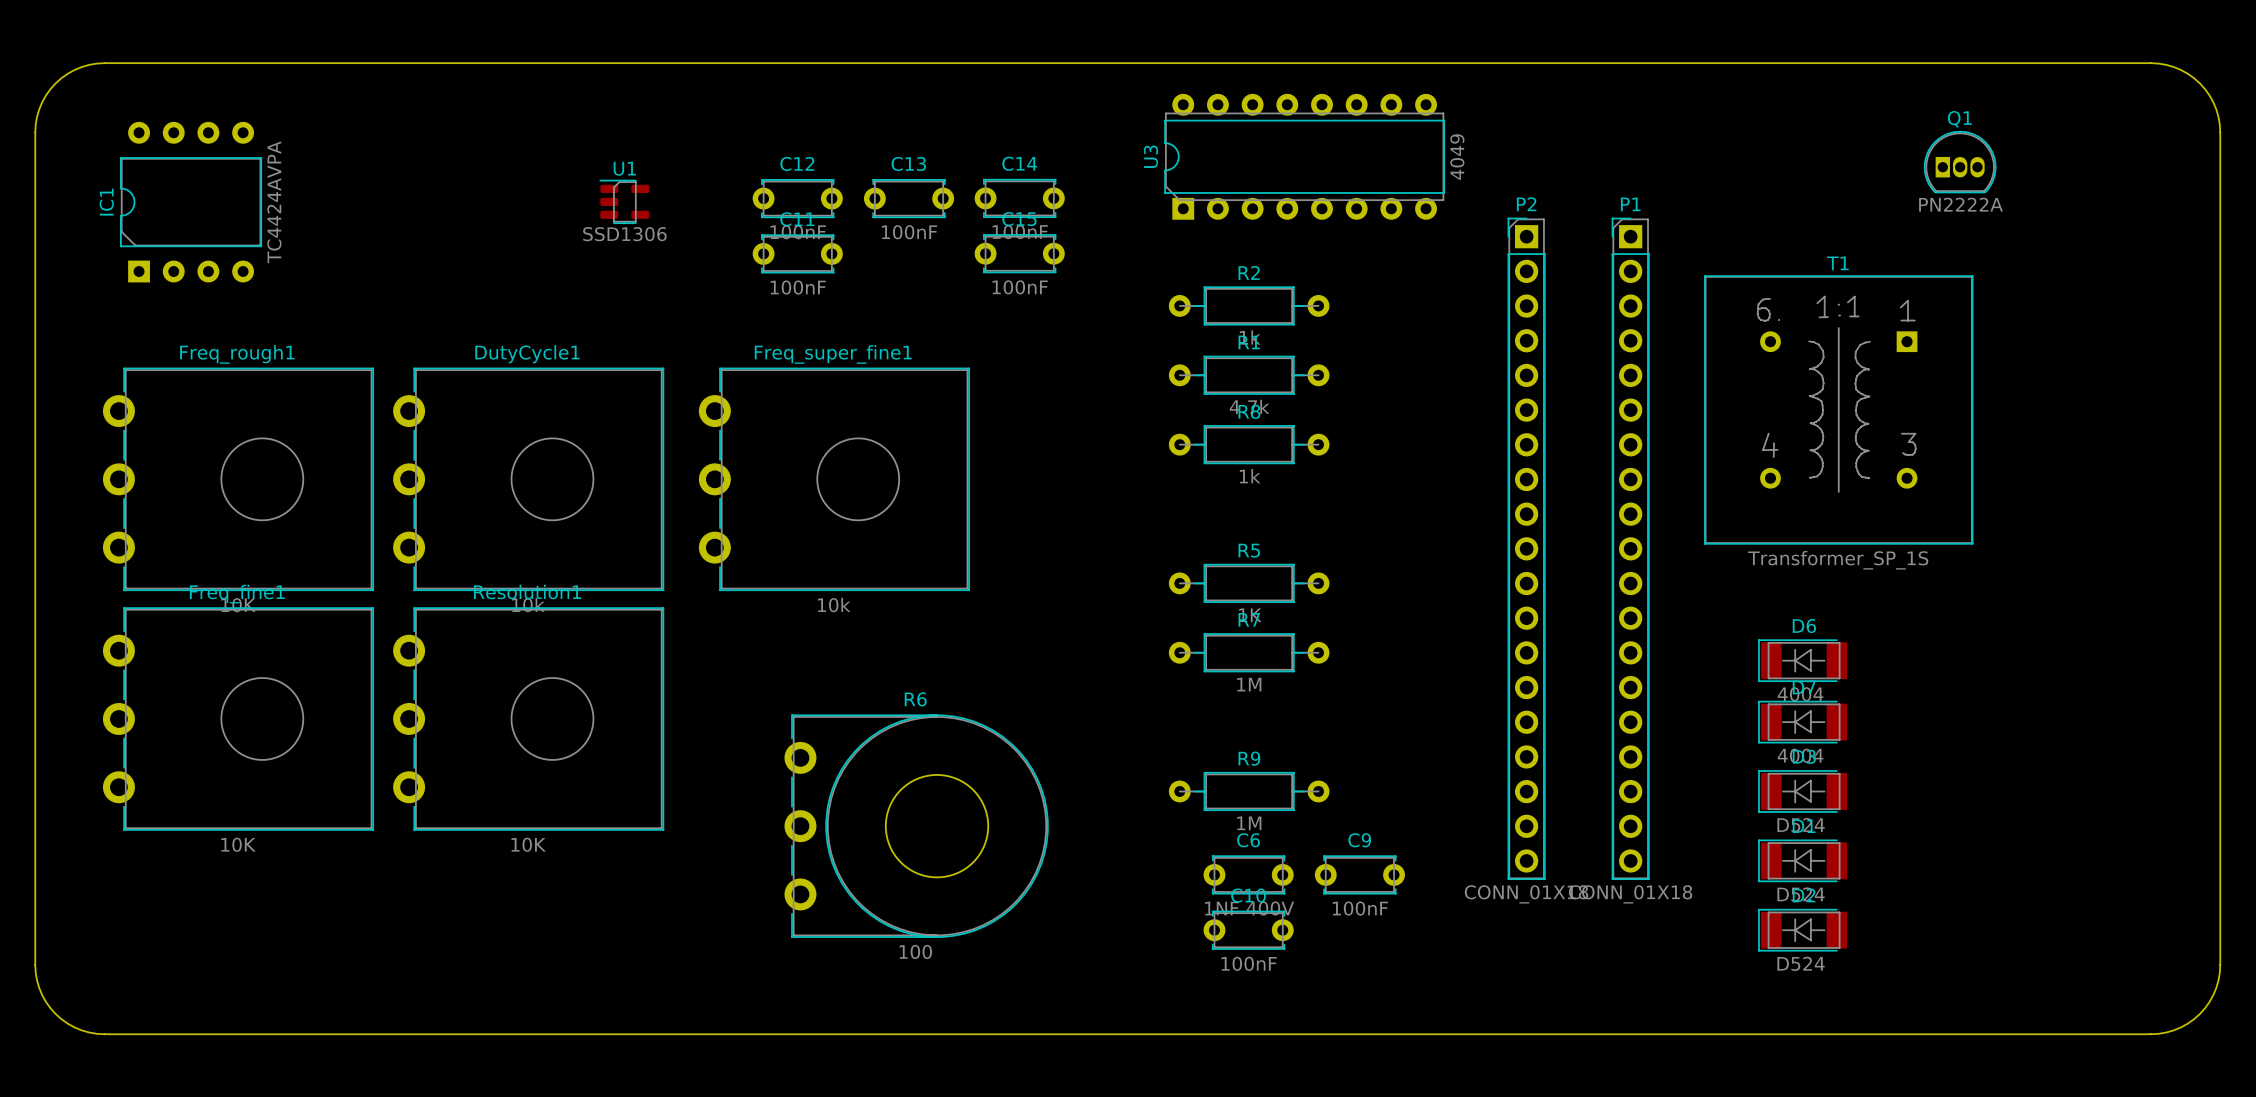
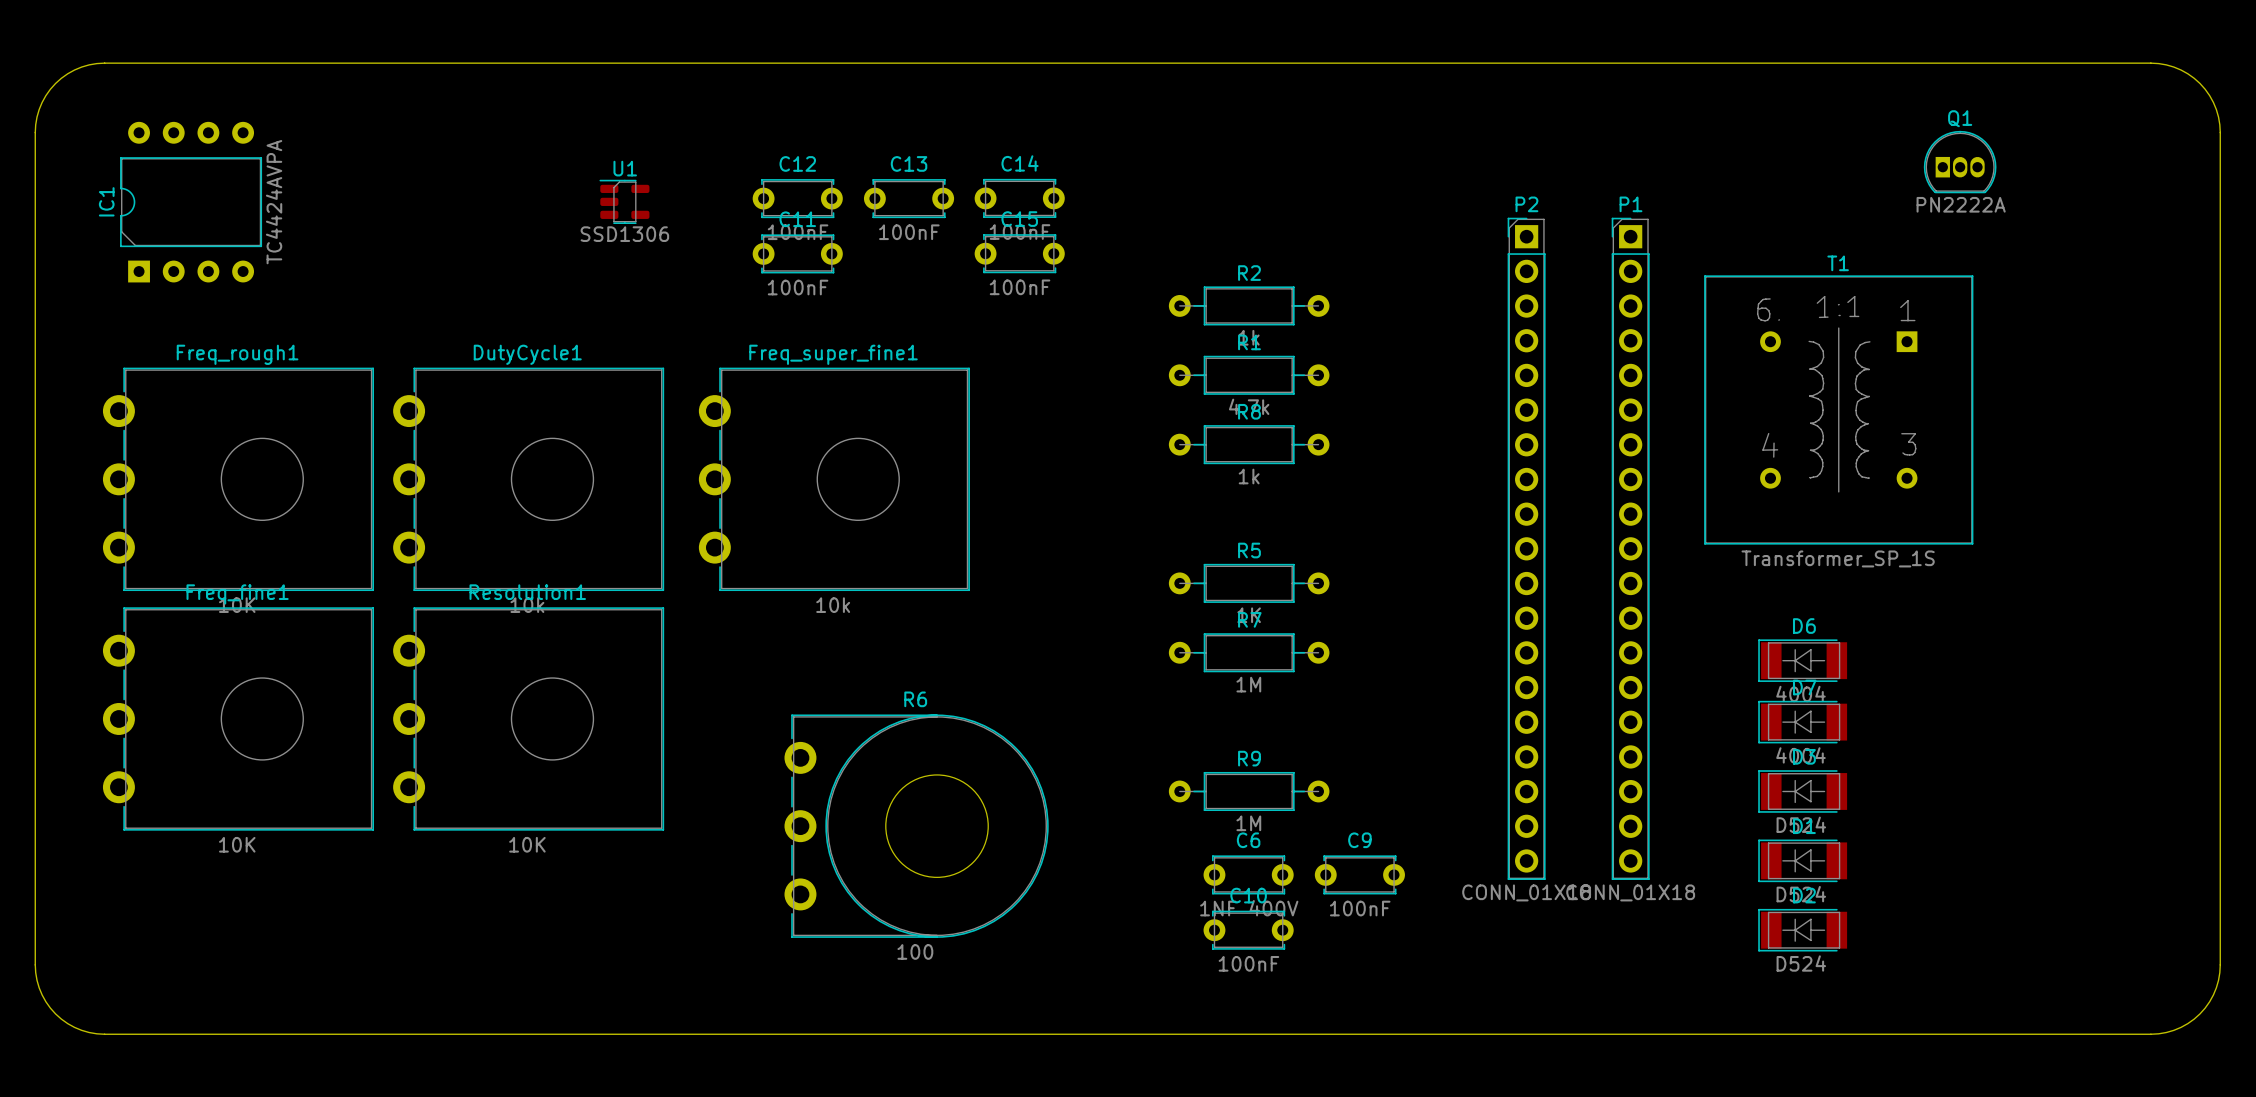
U3: 4049 (1304, 156) -> none

